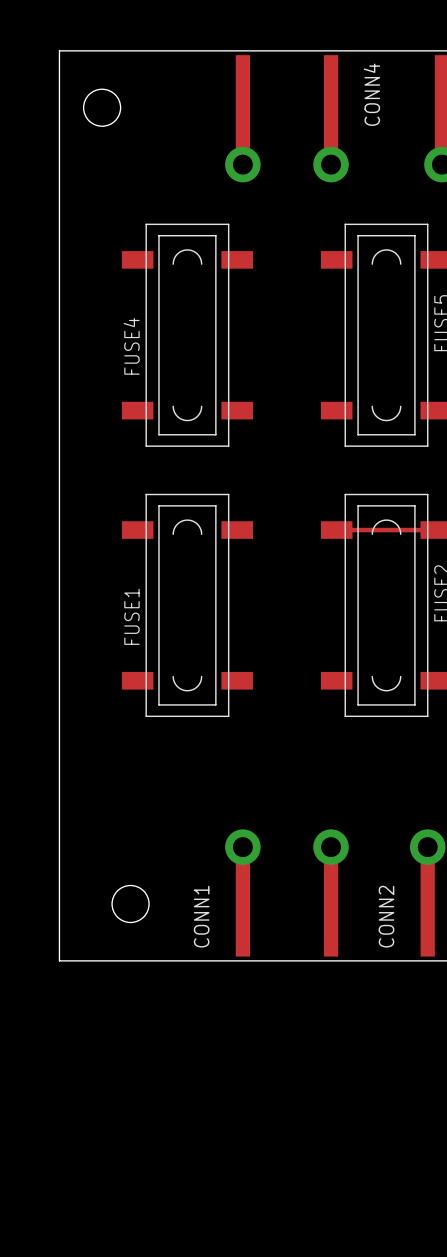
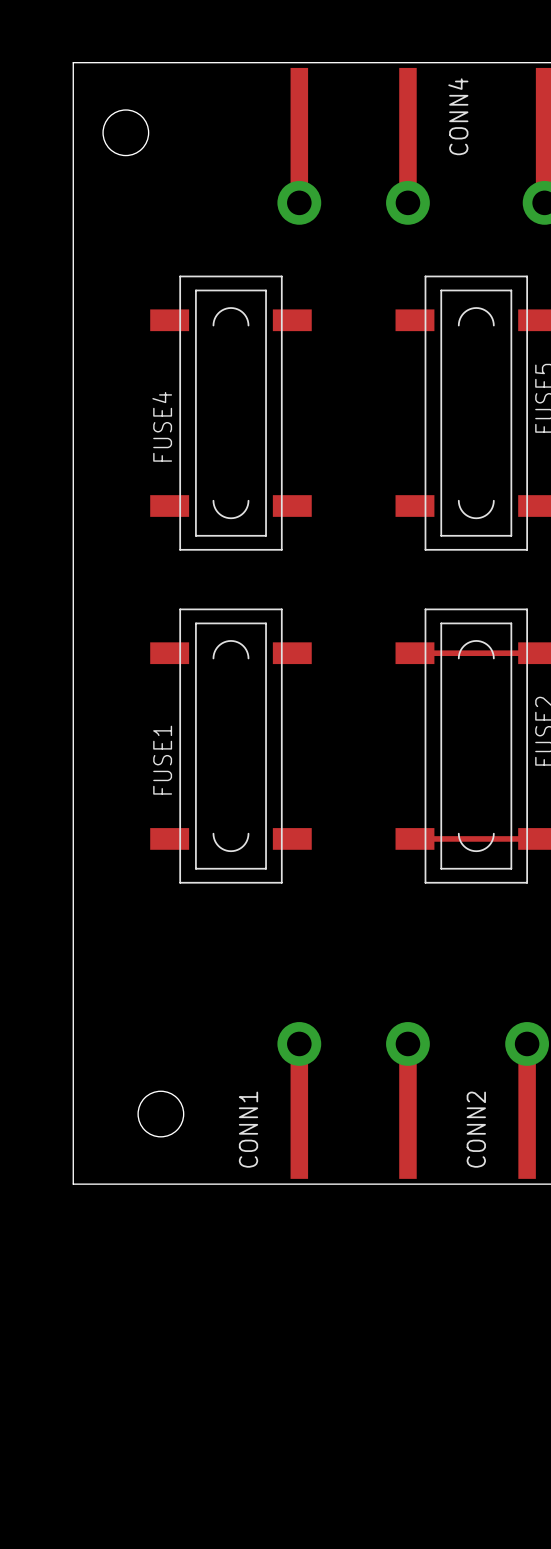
track: none -> (414, 838) (537, 838)

